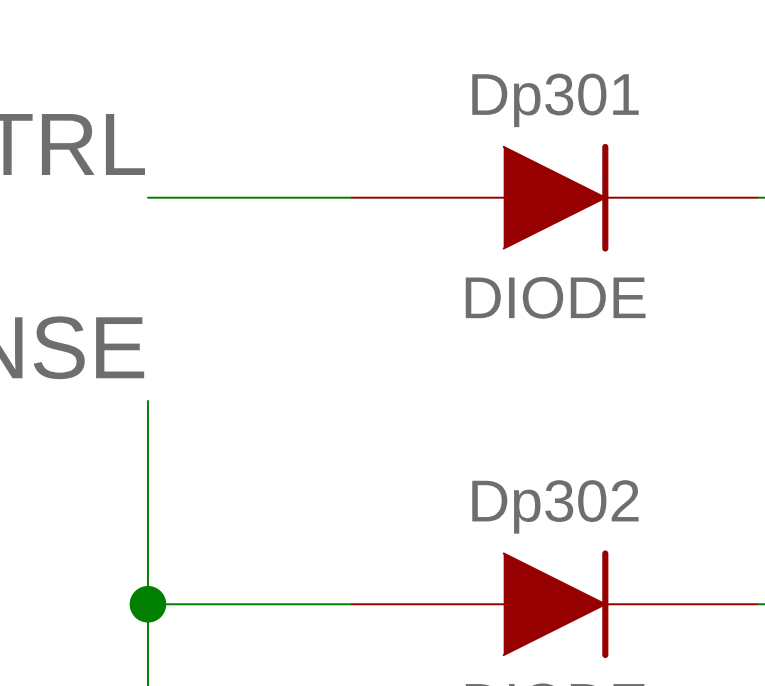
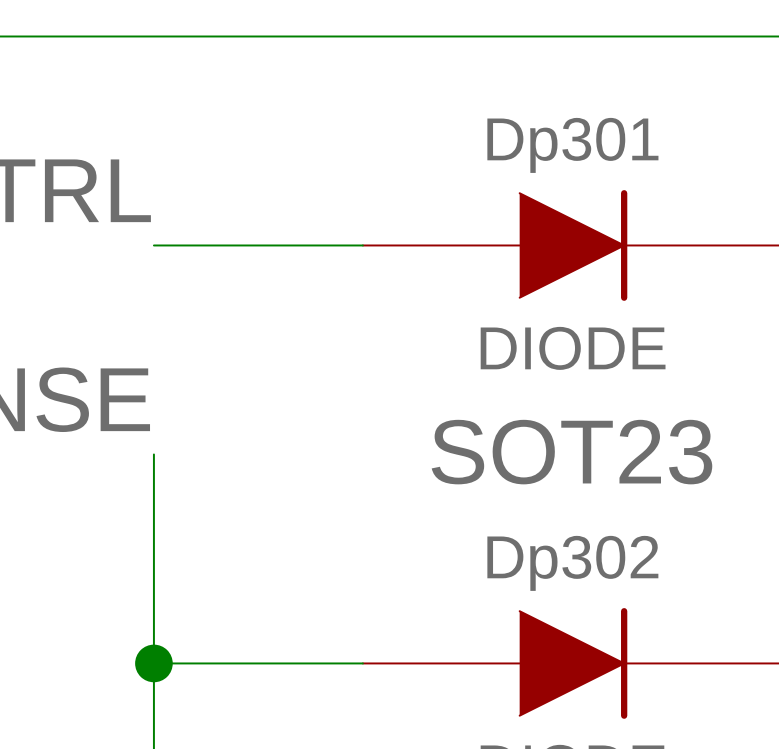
Dp301 text: none -> SOT23 (571, 452)

